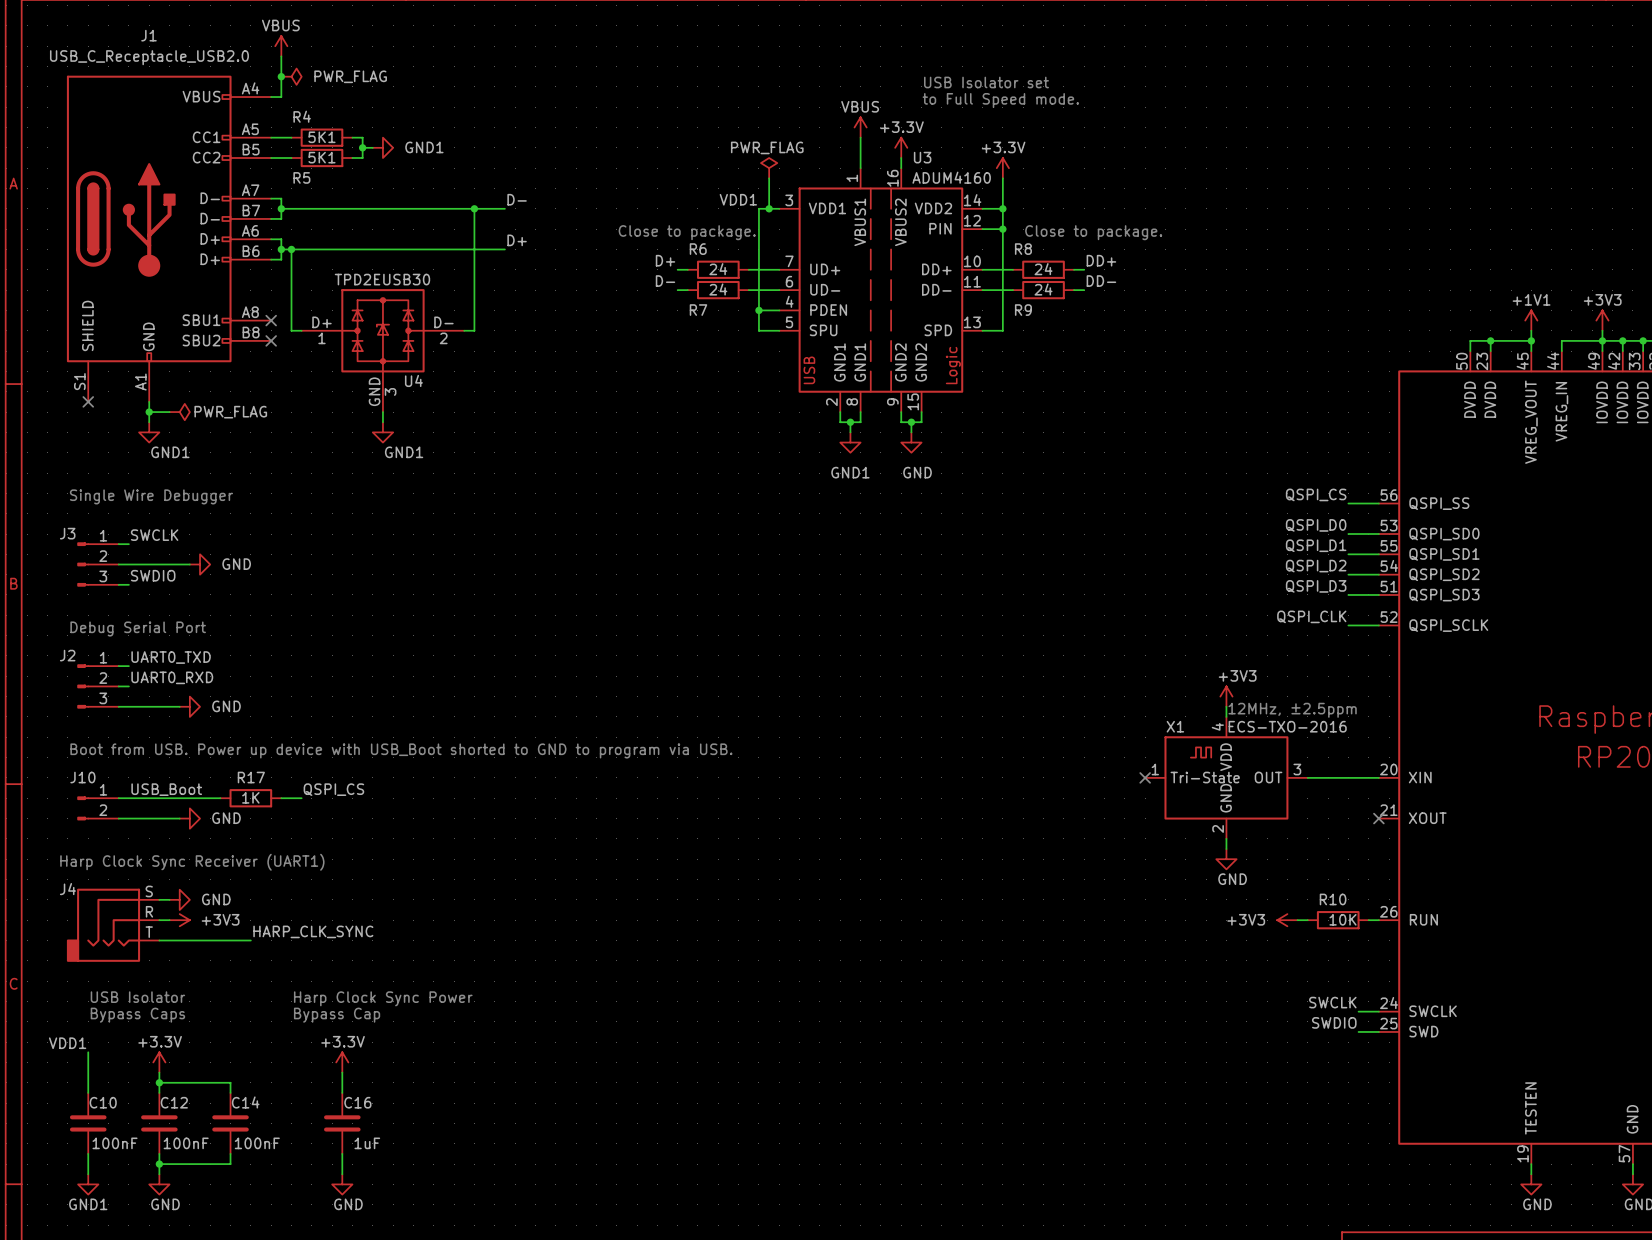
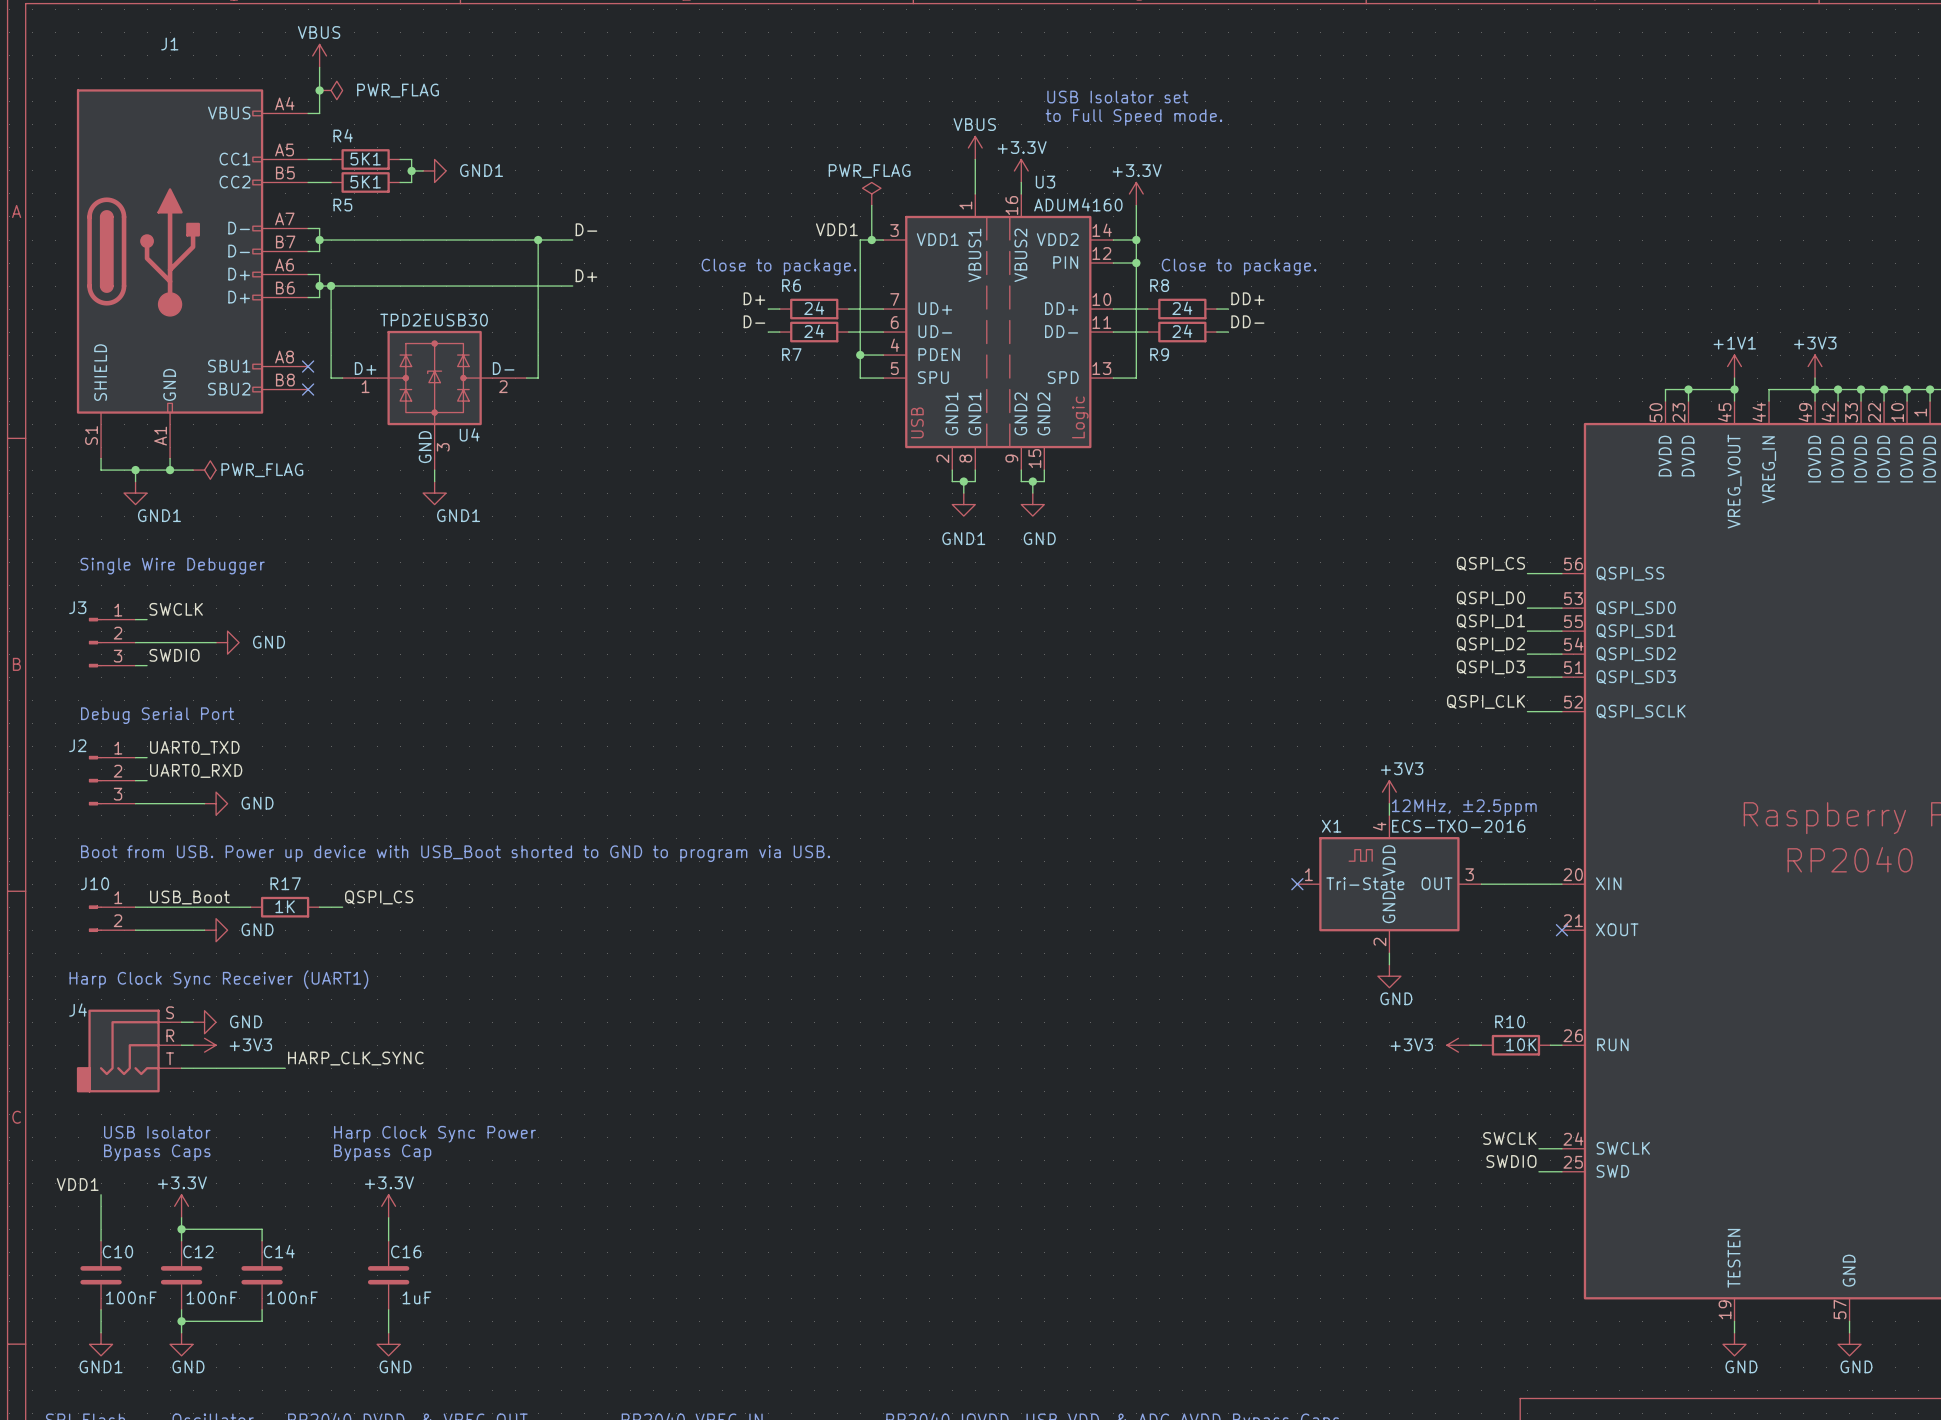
J1 value: USB_C_Receptacle_USB2.0 (149, 57) -> none
no-connect mark: (88, 401) -> none
wire: none -> (135, 470) (135, 481)
junction: none -> (135, 470)
wire: (149, 412) (149, 422) -> (170, 470) (101, 470) (101, 458)
power symbol position: GND1 (149, 432) -> GND1 (135, 493)

